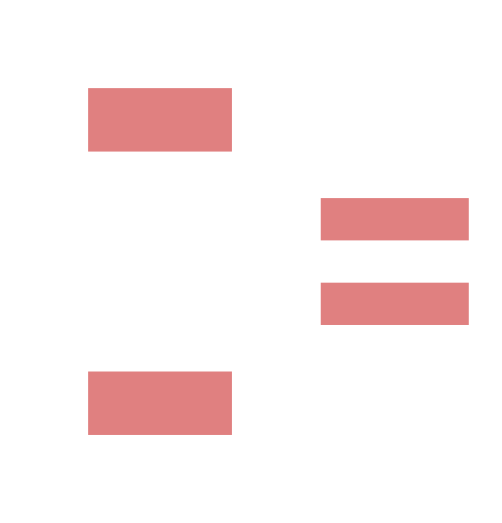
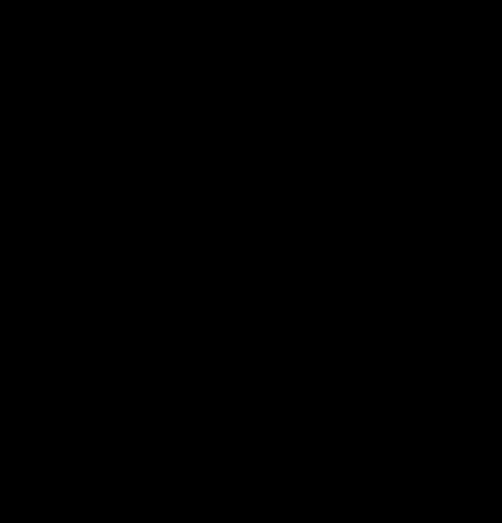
part: (278, 261) -> none

